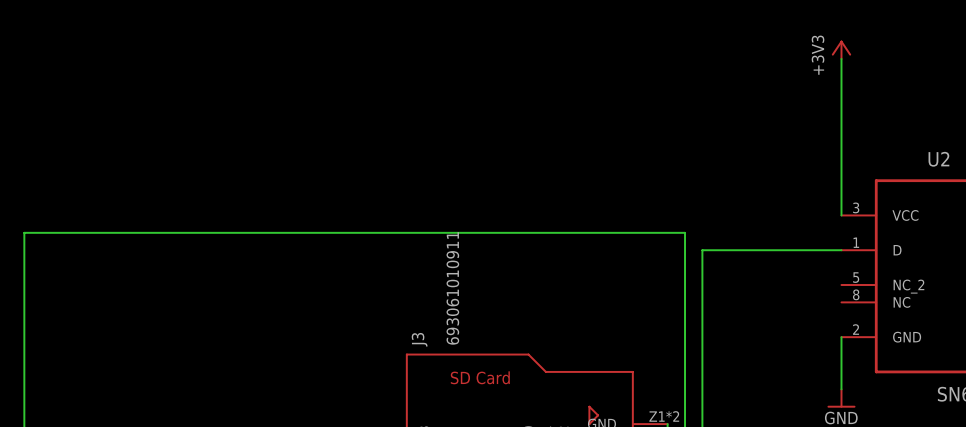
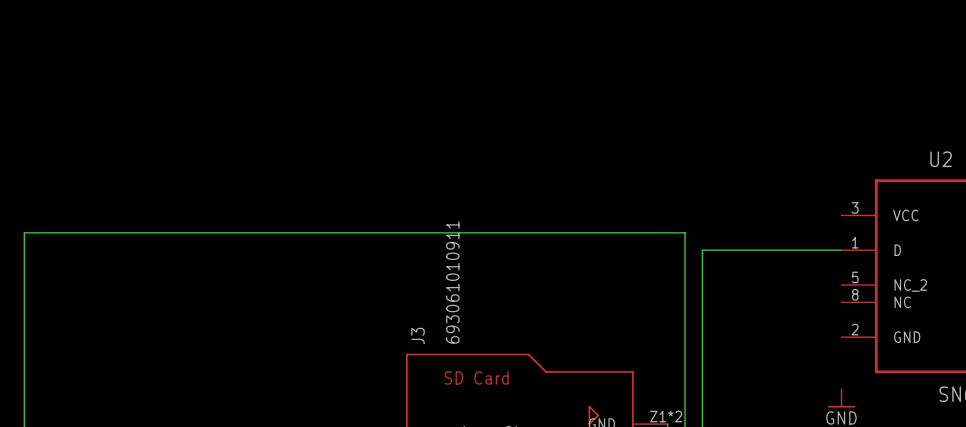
power symbol: +3V3 (841, 49) -> none
wire: (841, 58) (841, 215) -> none
wire: (841, 337) (841, 389) -> none

